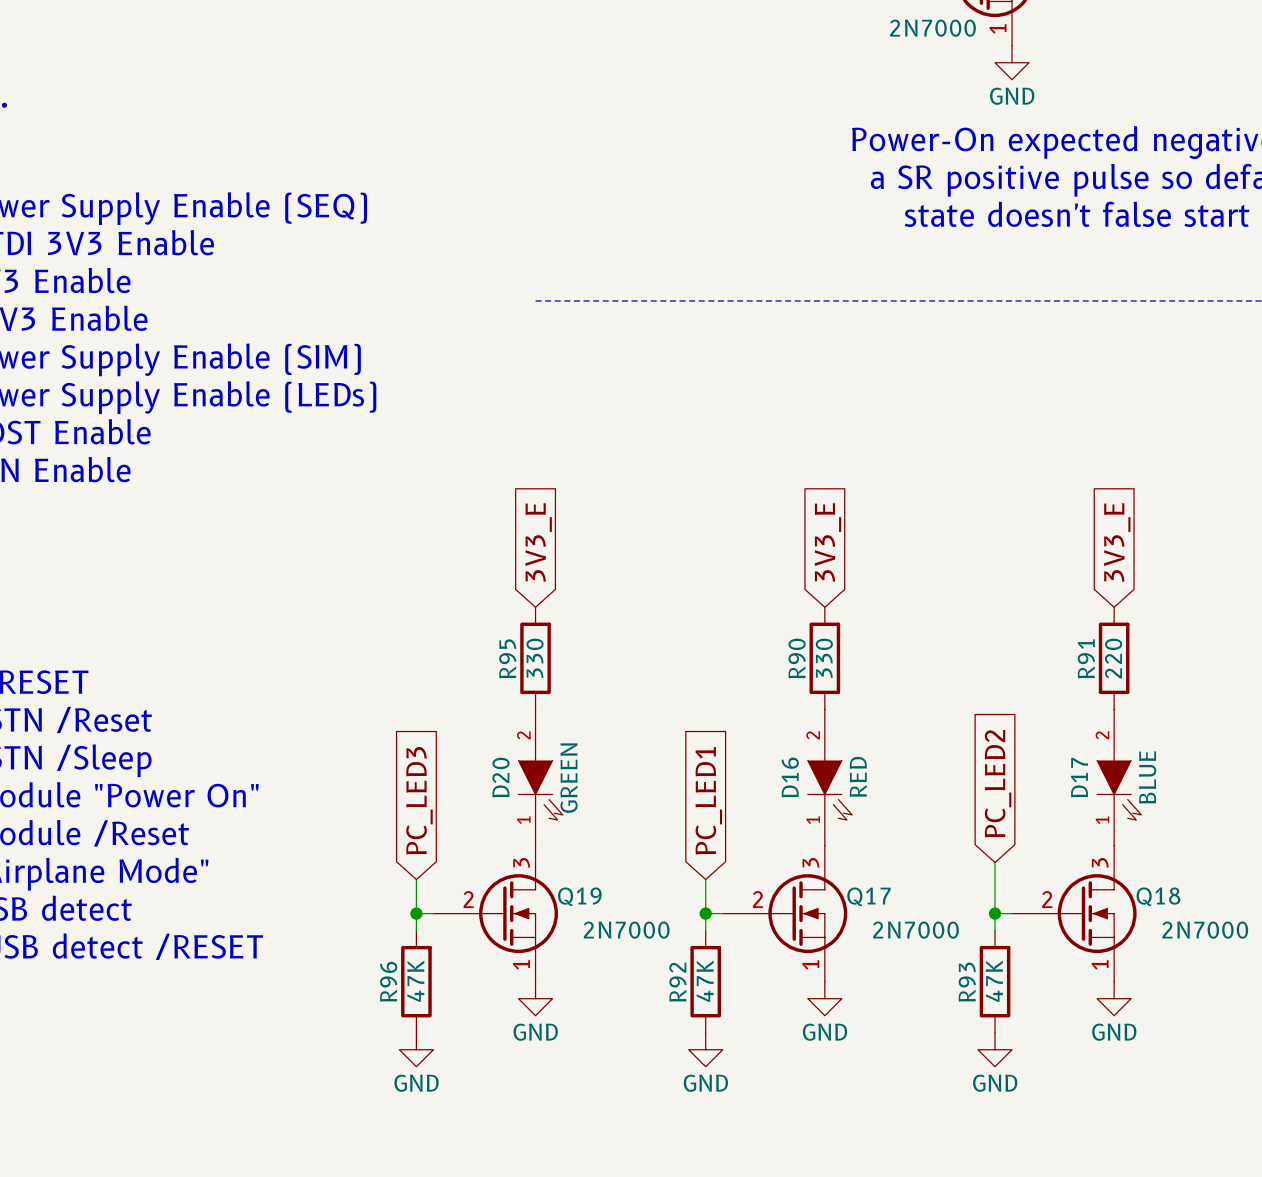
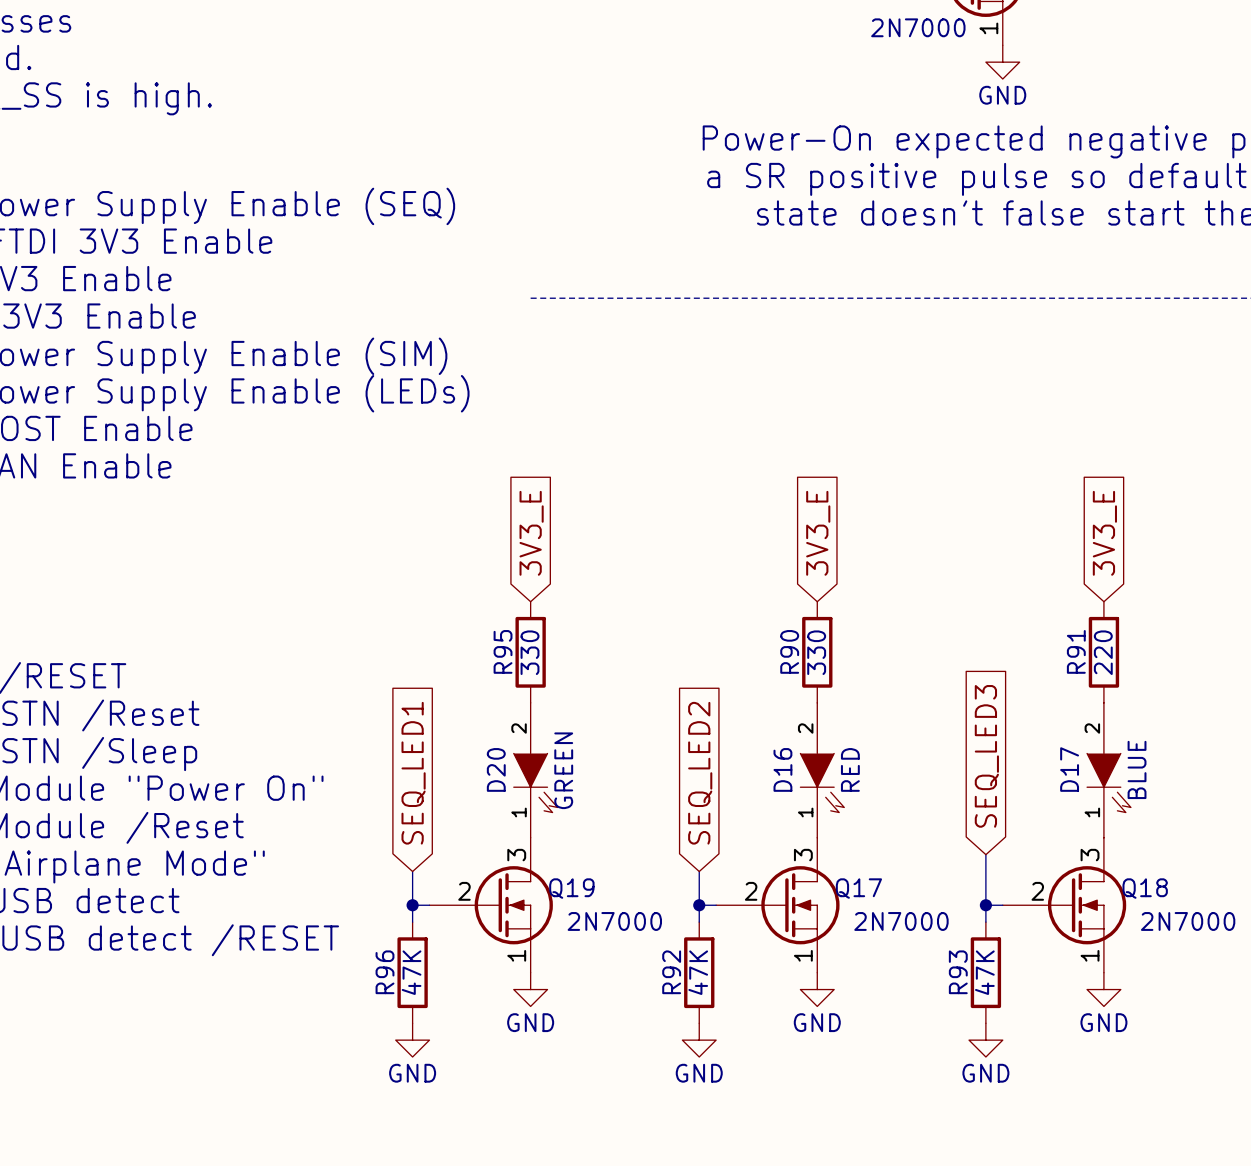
global label: PC_LED2 (998, 783) -> SEQ_LED3 (986, 756)
global label: PC_LED3 (419, 800) -> SEQ_LED1 (413, 773)
global label: PC_LED1 (708, 800) -> SEQ_LED2 (700, 773)

